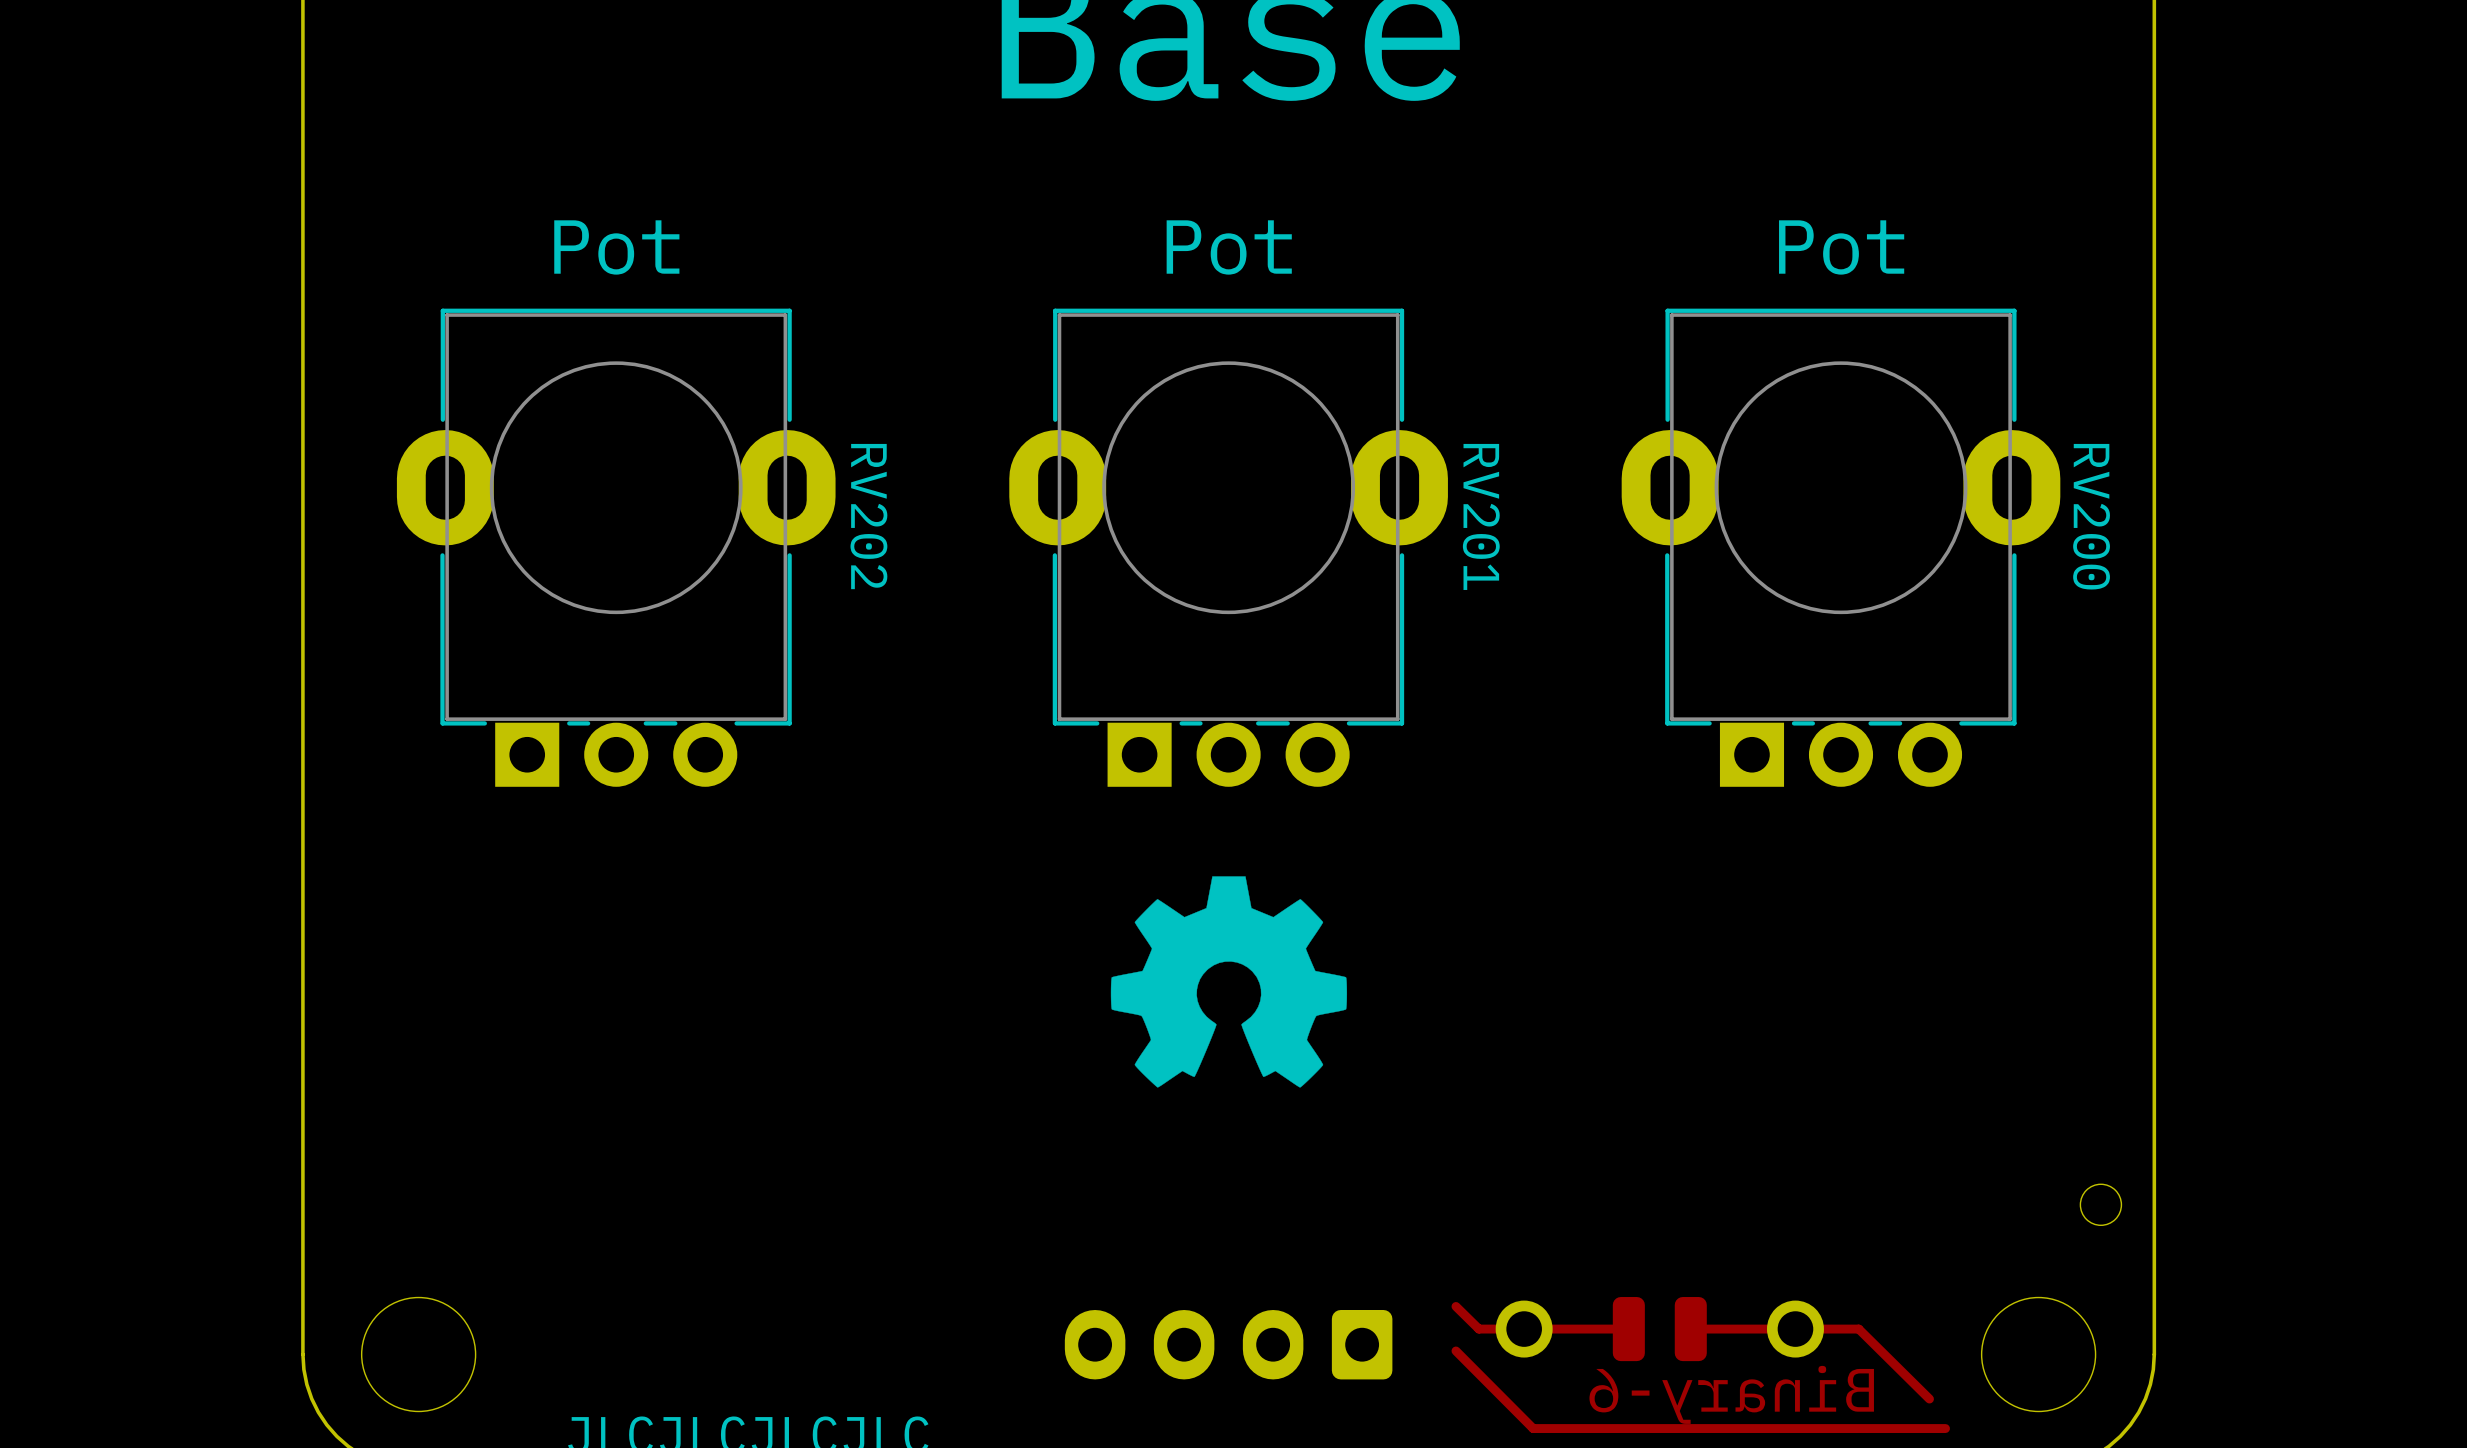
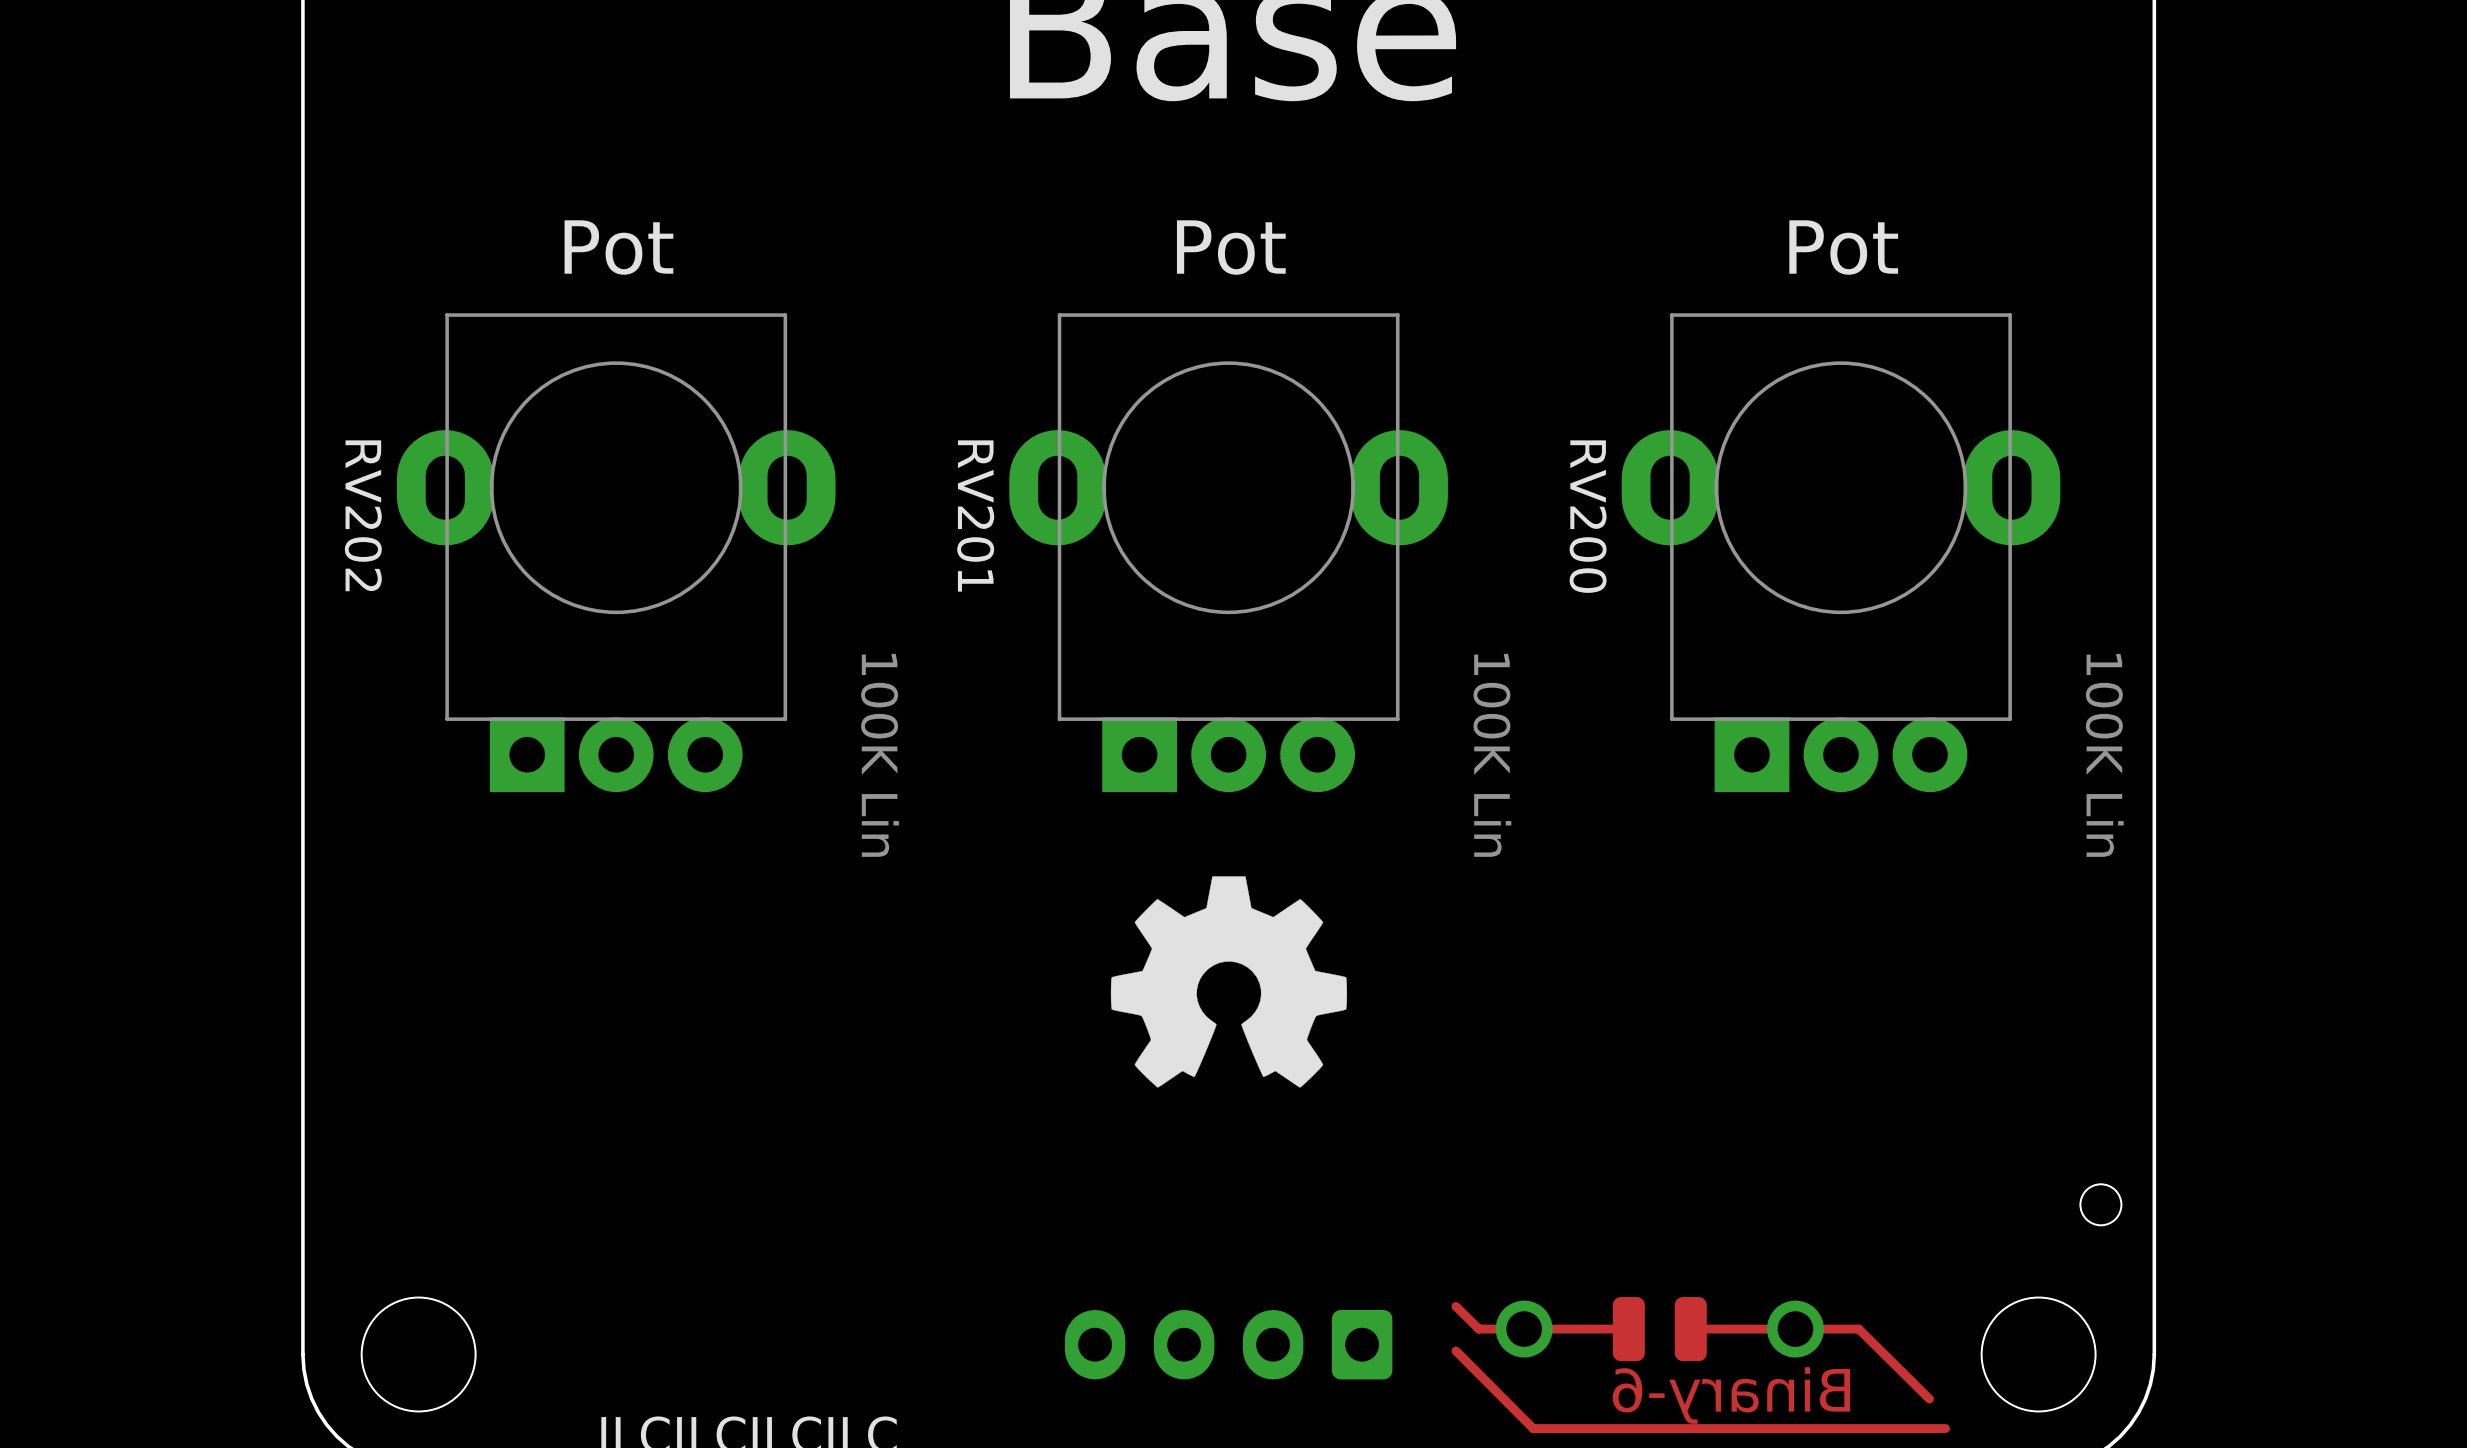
RV202 footprint: [396, 308, 836, 787] -> [396, 313, 836, 793]
RV201 footprint: [1009, 308, 1448, 787] -> [1009, 313, 1448, 793]
RV200 footprint: [1621, 308, 2061, 787] -> [1621, 313, 2061, 793]
RV202 name position: RV202 (868, 516) -> RV202 (363, 515)
RV201 name position: RV201 (1481, 516) -> RV201 (975, 516)
RV200 name position: RV200 (2091, 516) -> RV200 (1588, 516)
RV202 value: none -> 100K Lin (880, 755)
RV201 value: none -> 100K Lin (1492, 755)
RV200 value: none -> 100K Lin (2104, 755)

